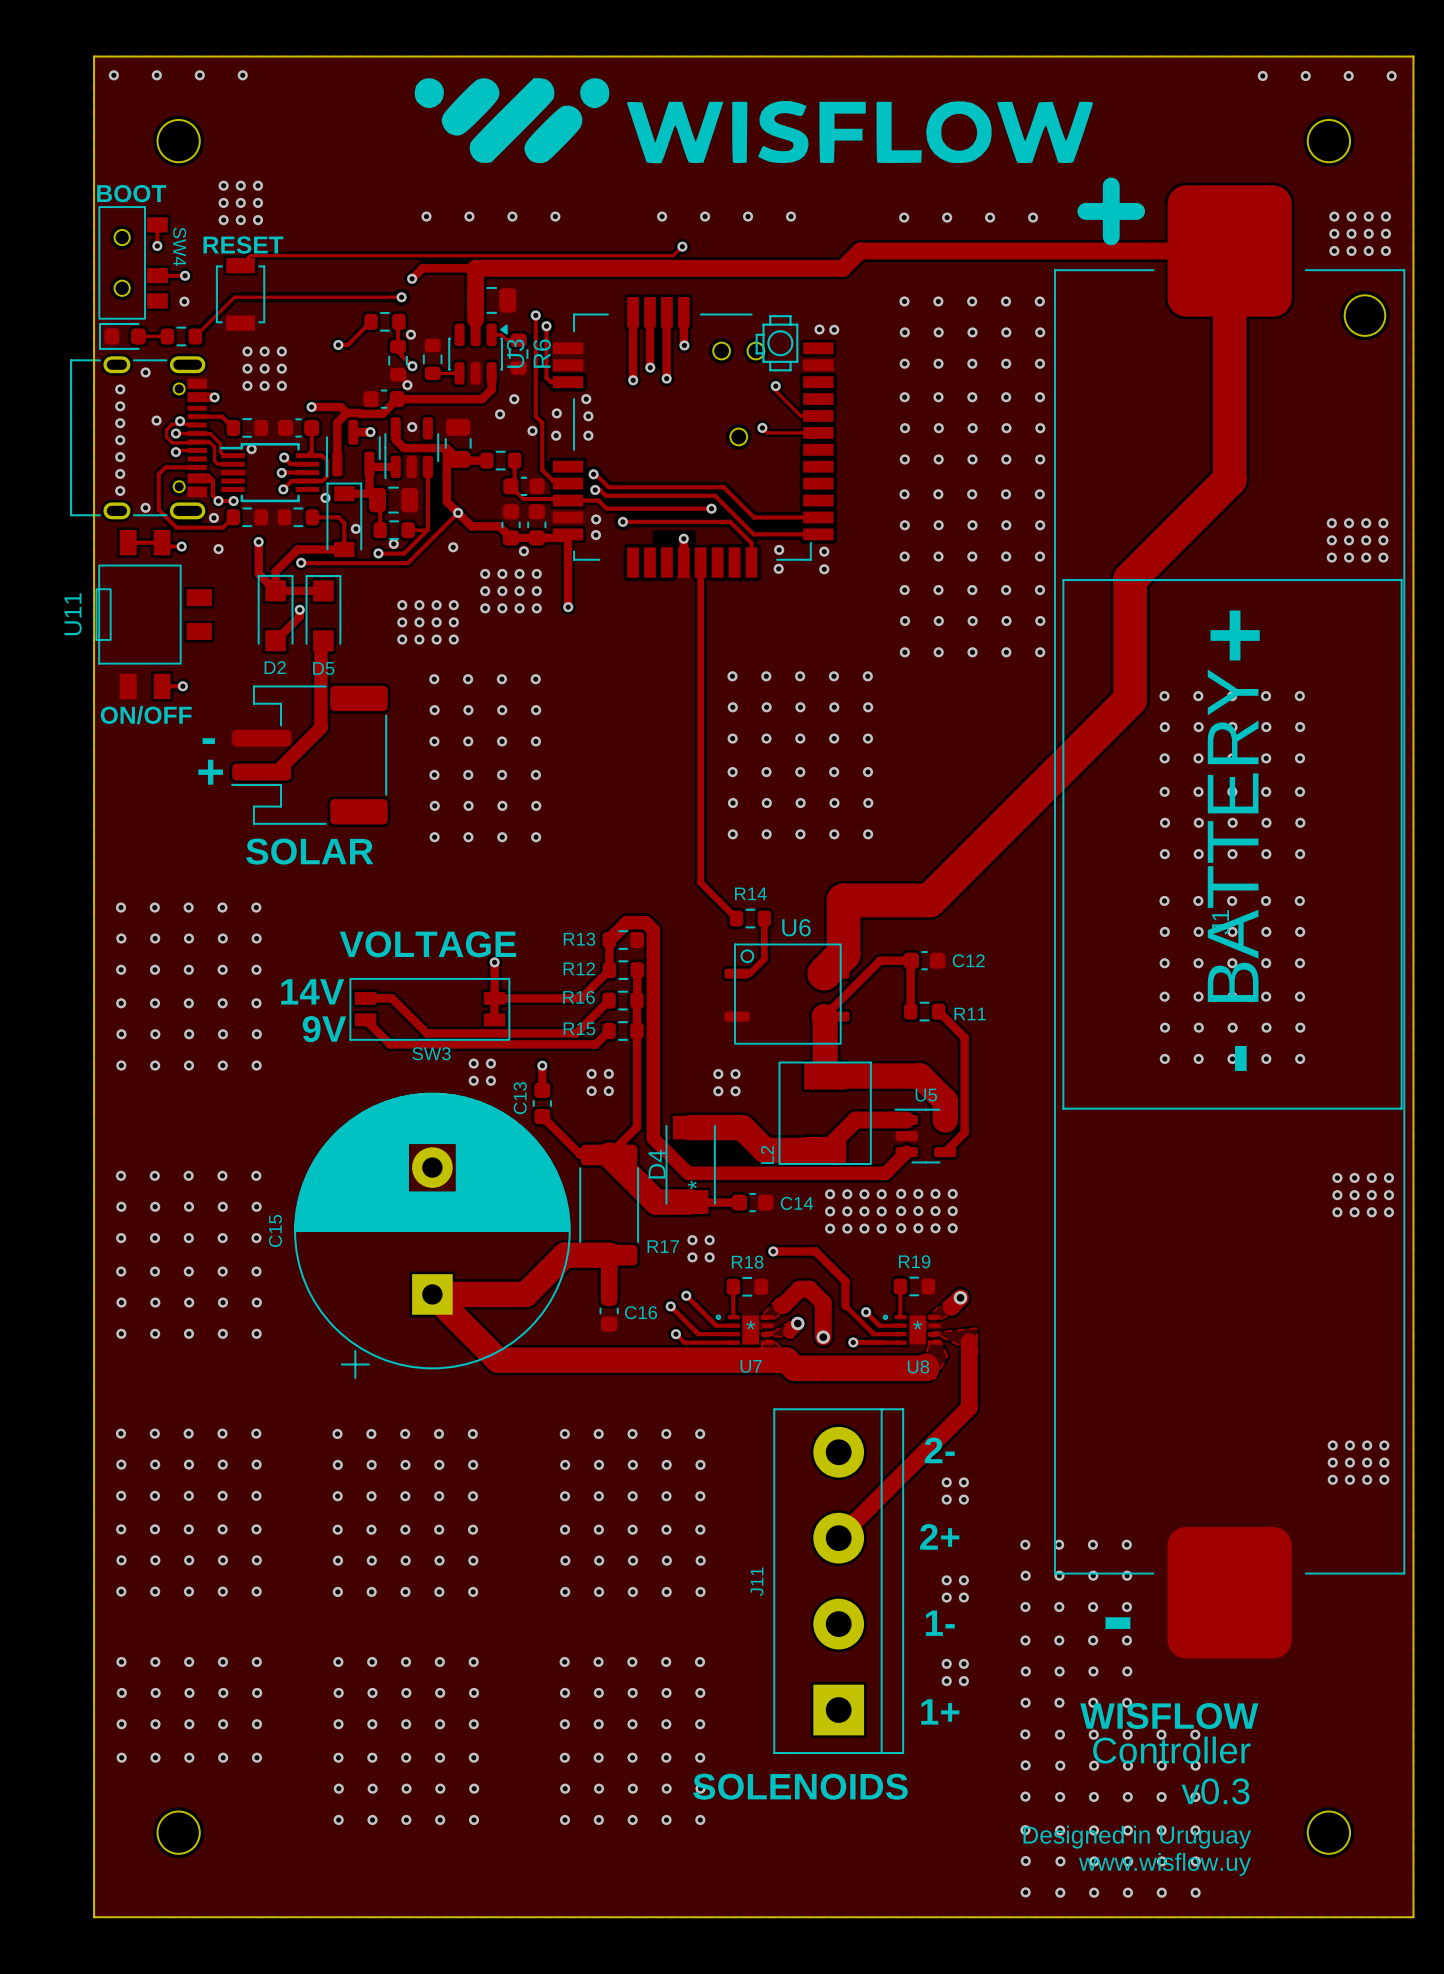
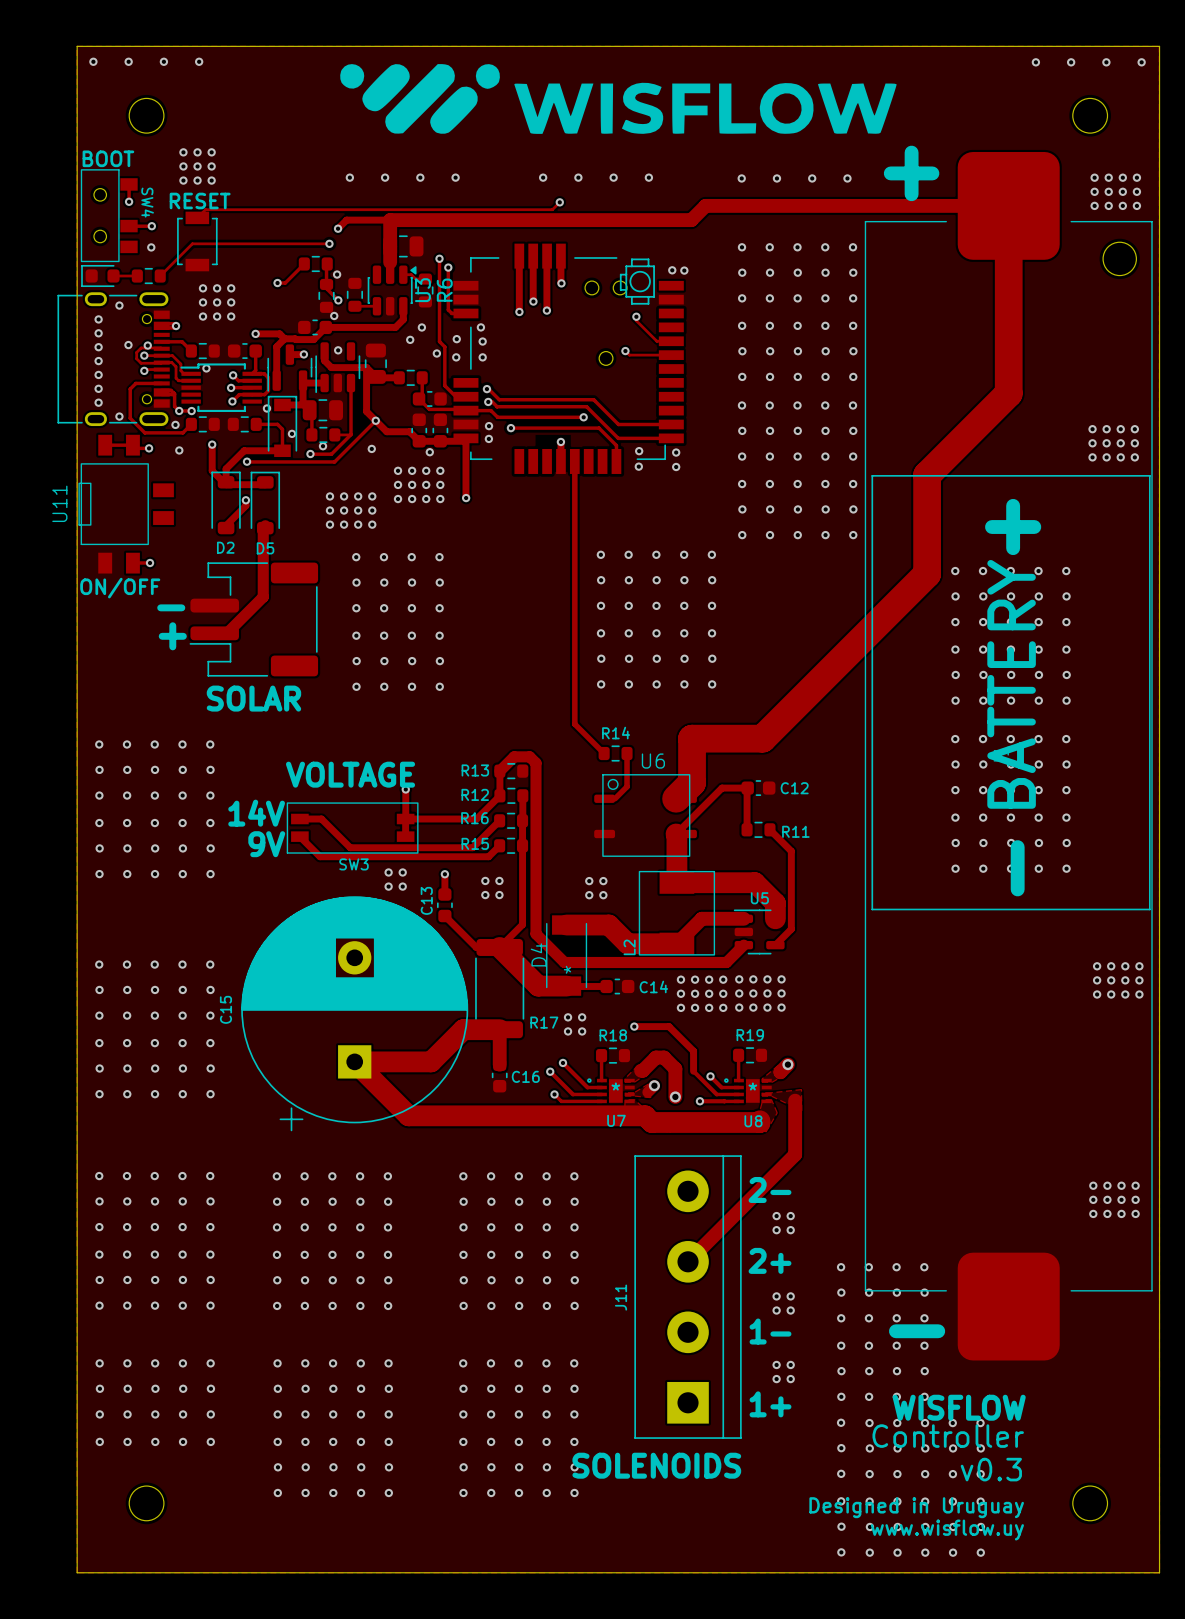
D2 footprint: [257, 574, 294, 652] -> [211, 471, 241, 535]
D5 footprint: [305, 574, 342, 652] -> [250, 471, 281, 535]

